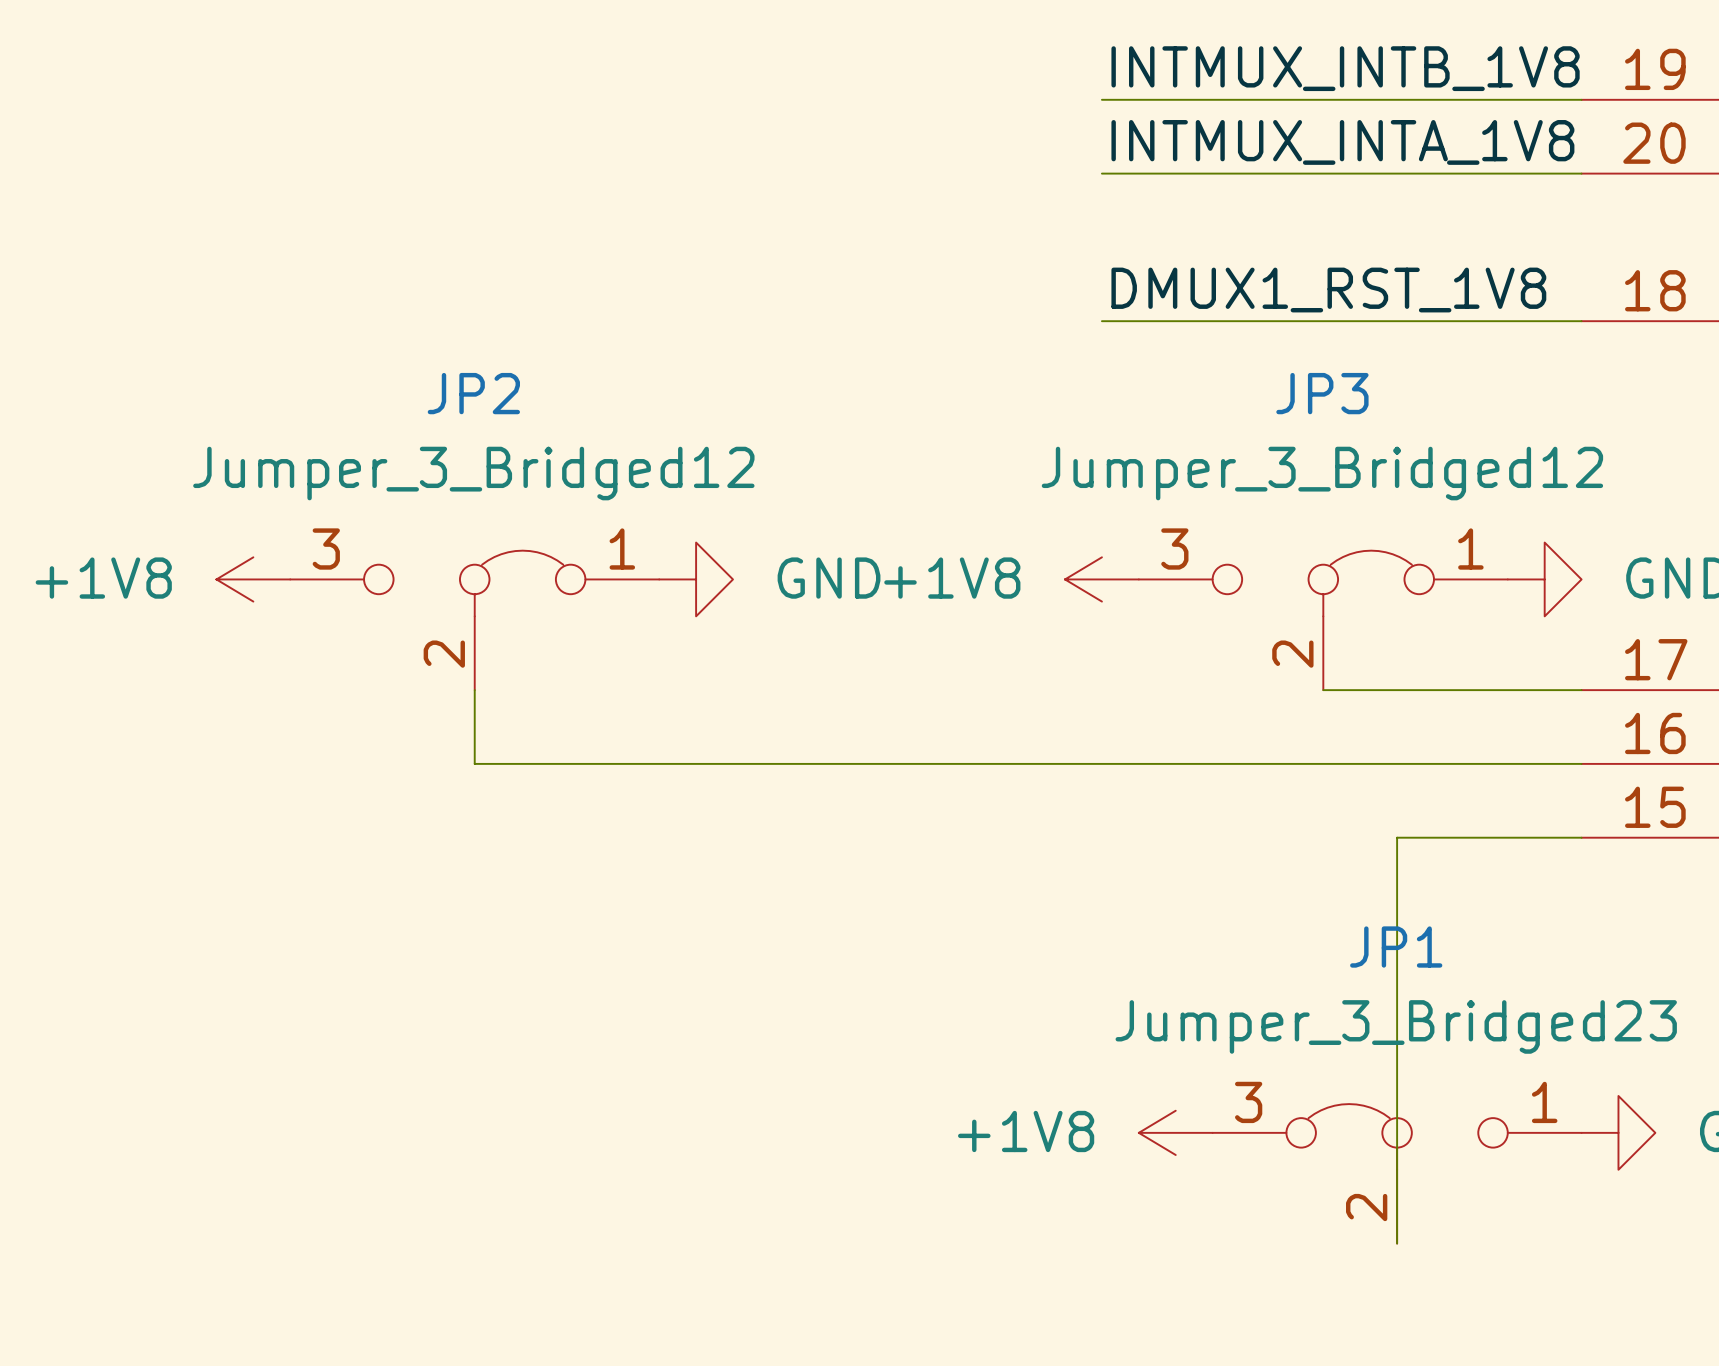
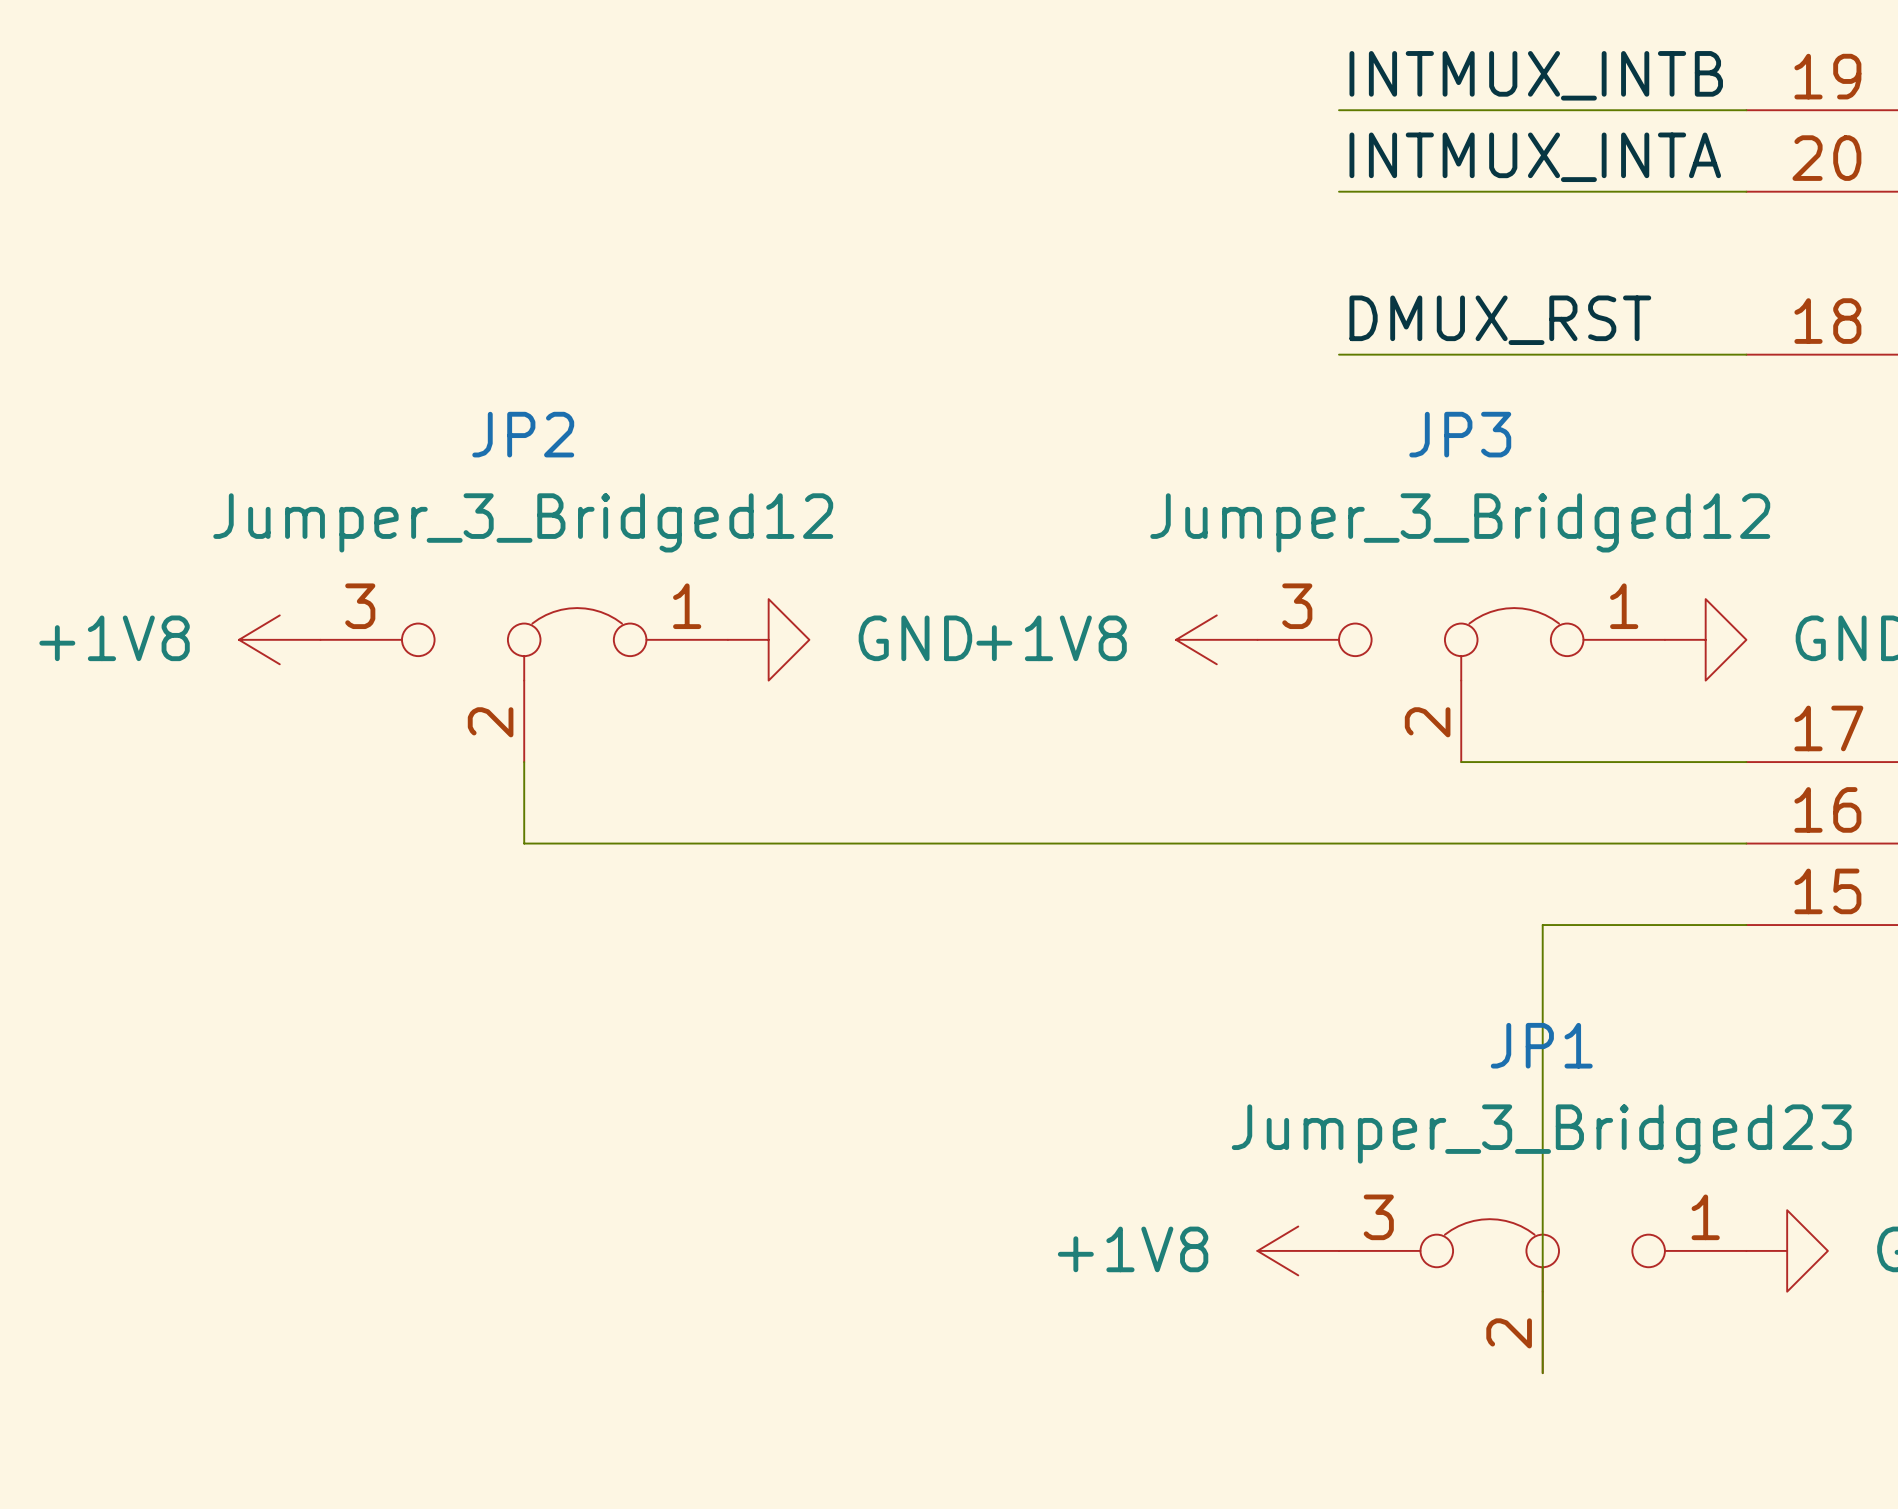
label: INTMUX_INTB_1V8 (1345, 68) -> none
label: none -> INTMUX_INTB (1536, 75)
wire: (1101, 99) (1212, 99) -> none
label: INTMUX_INTA_1V8 (1342, 142) -> none
label: none -> INTMUX_INTA (1535, 157)
wire: (1101, 173) (1212, 173) -> none
label: DMUX1_RST_1V8 (1328, 290) -> DMUX_RST (1500, 320)
wire: (1101, 321) (1212, 321) -> none

